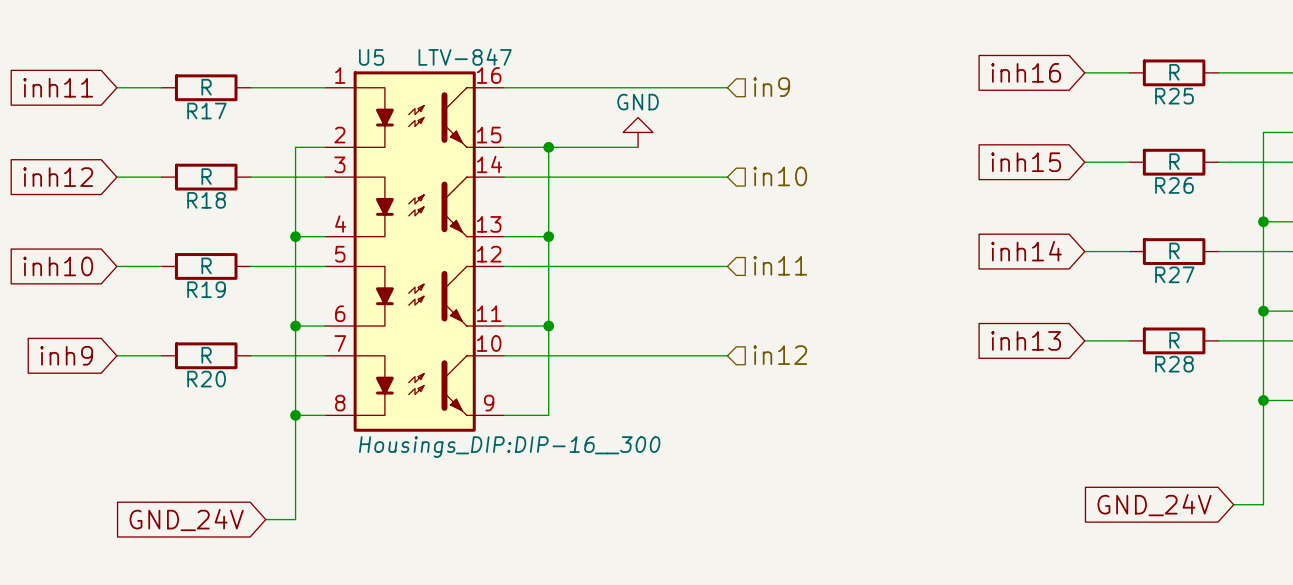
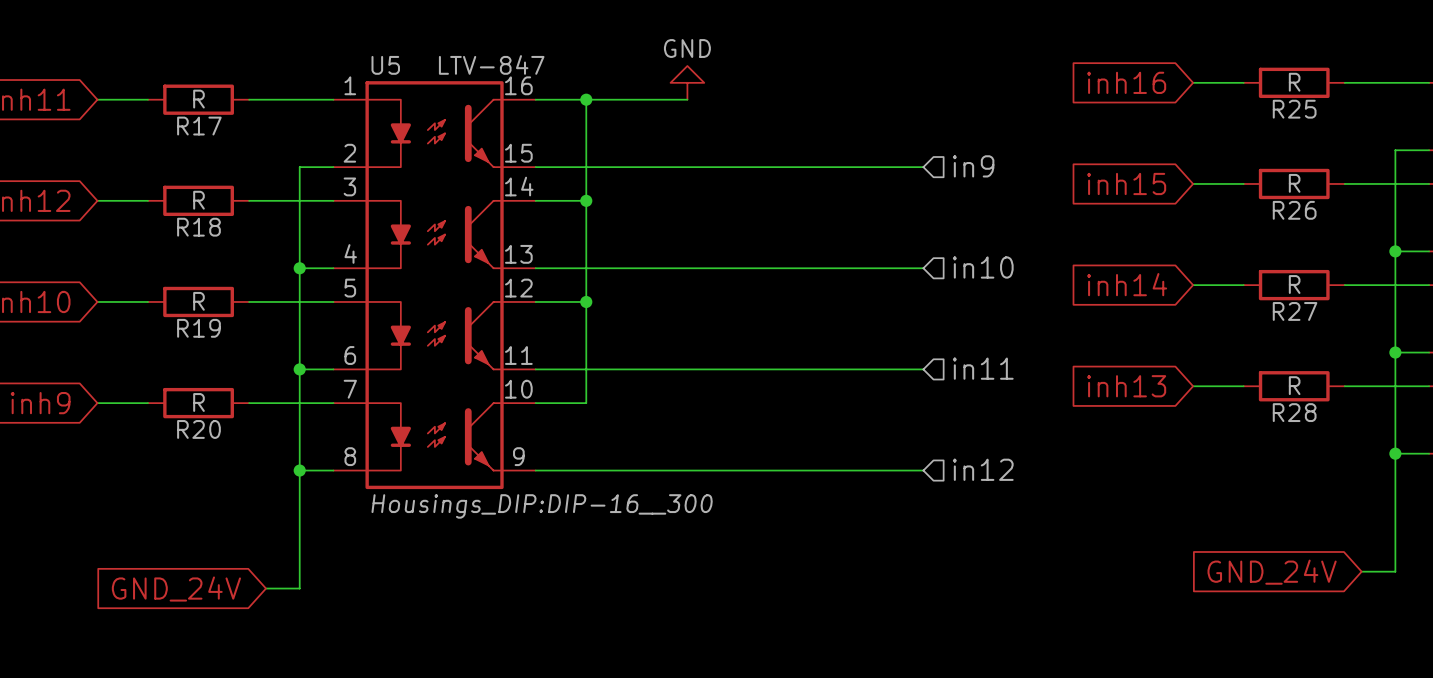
wire: none -> (586, 99) (586, 167)
junction: none -> (586, 99)
wire: (638, 87) (727, 87) -> none
hierarchical label position: in9 (771, 87) -> in9 (973, 166)
power symbol position: GND (638, 132) -> GND (687, 82)
junction: (548, 147) -> none
wire: none -> (687, 167) (923, 167)
hierarchical label position: in10 (780, 176) -> in10 (983, 267)
wire: (548, 177) (727, 177) -> none
junction: none -> (586, 200)
wire: none -> (586, 268) (923, 268)
junction: (548, 236) -> none
hierarchical label position: in11 (780, 265) -> in11 (983, 368)
wire: (548, 266) (727, 266) -> none
junction: none -> (586, 301)
wire: none -> (586, 369) (923, 369)
junction: (548, 326) -> none
wire: (727, 355) (548, 355) (548, 415) -> (923, 470) (586, 470)
hierarchical label position: in12 (780, 355) -> in12 (983, 469)

